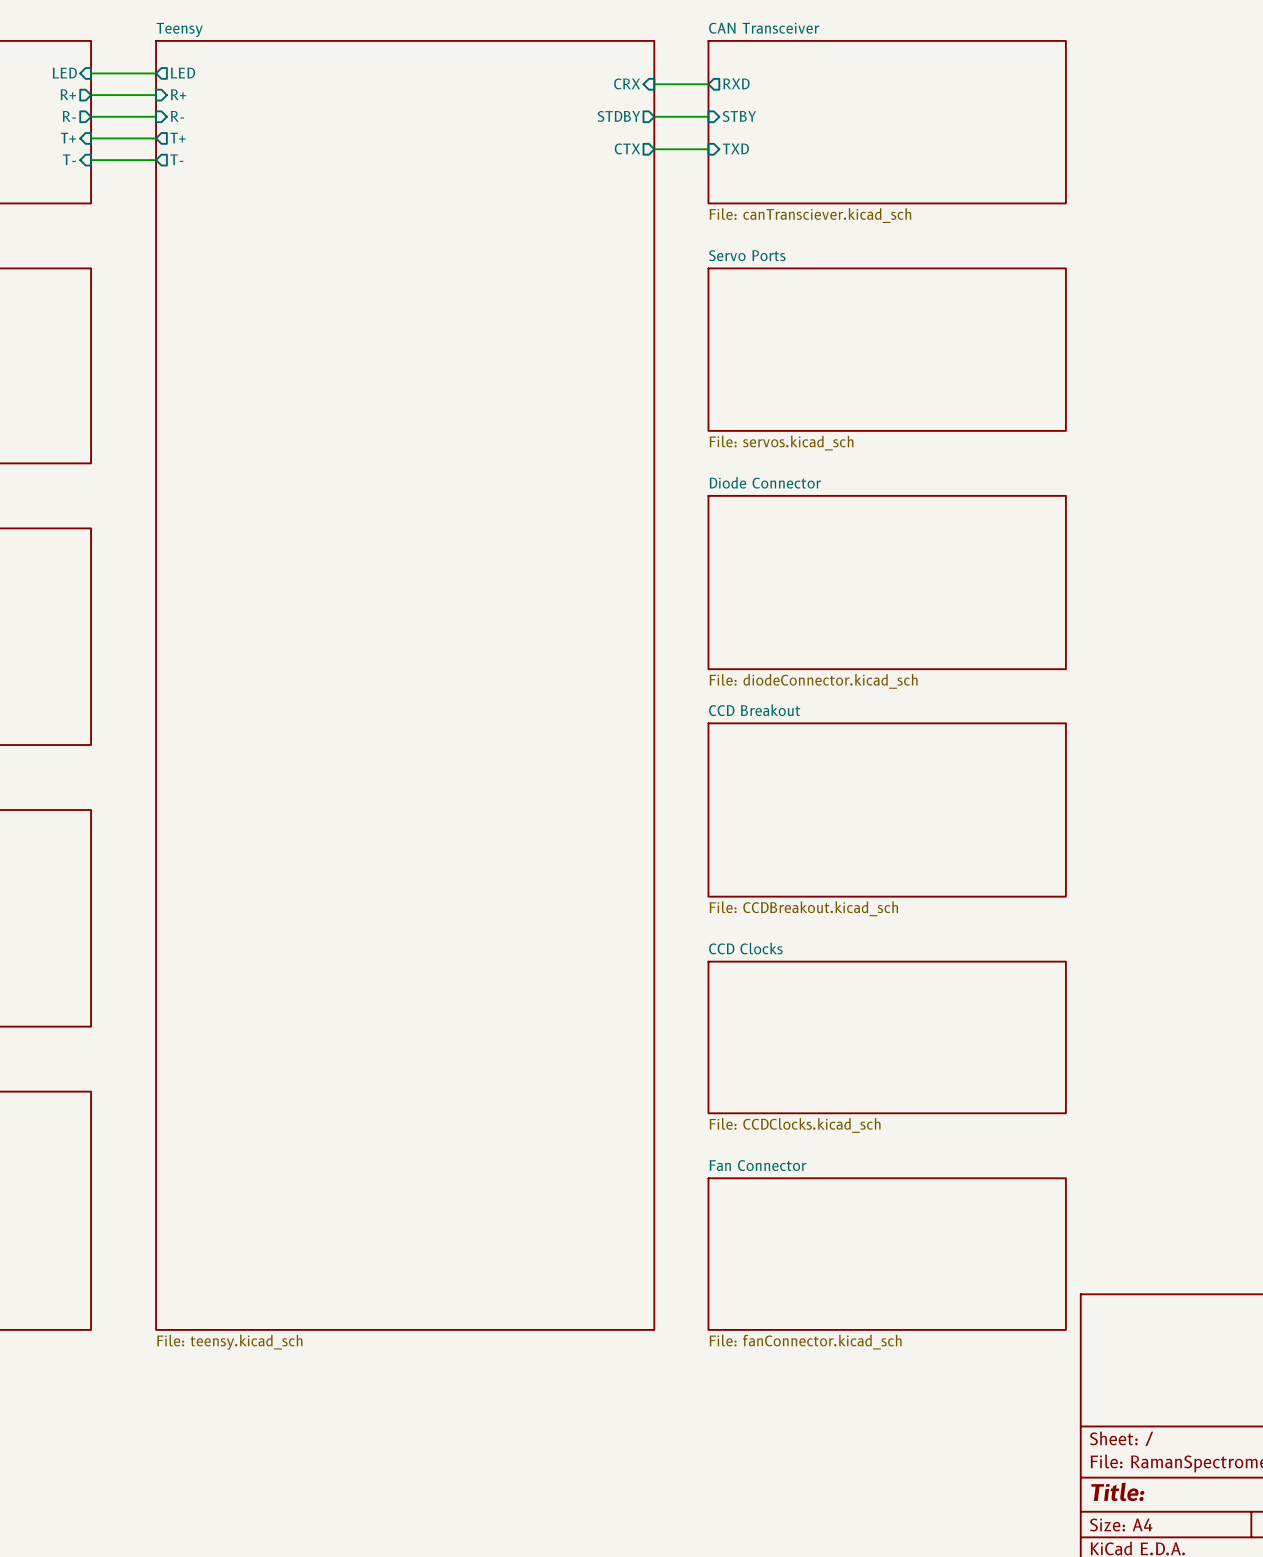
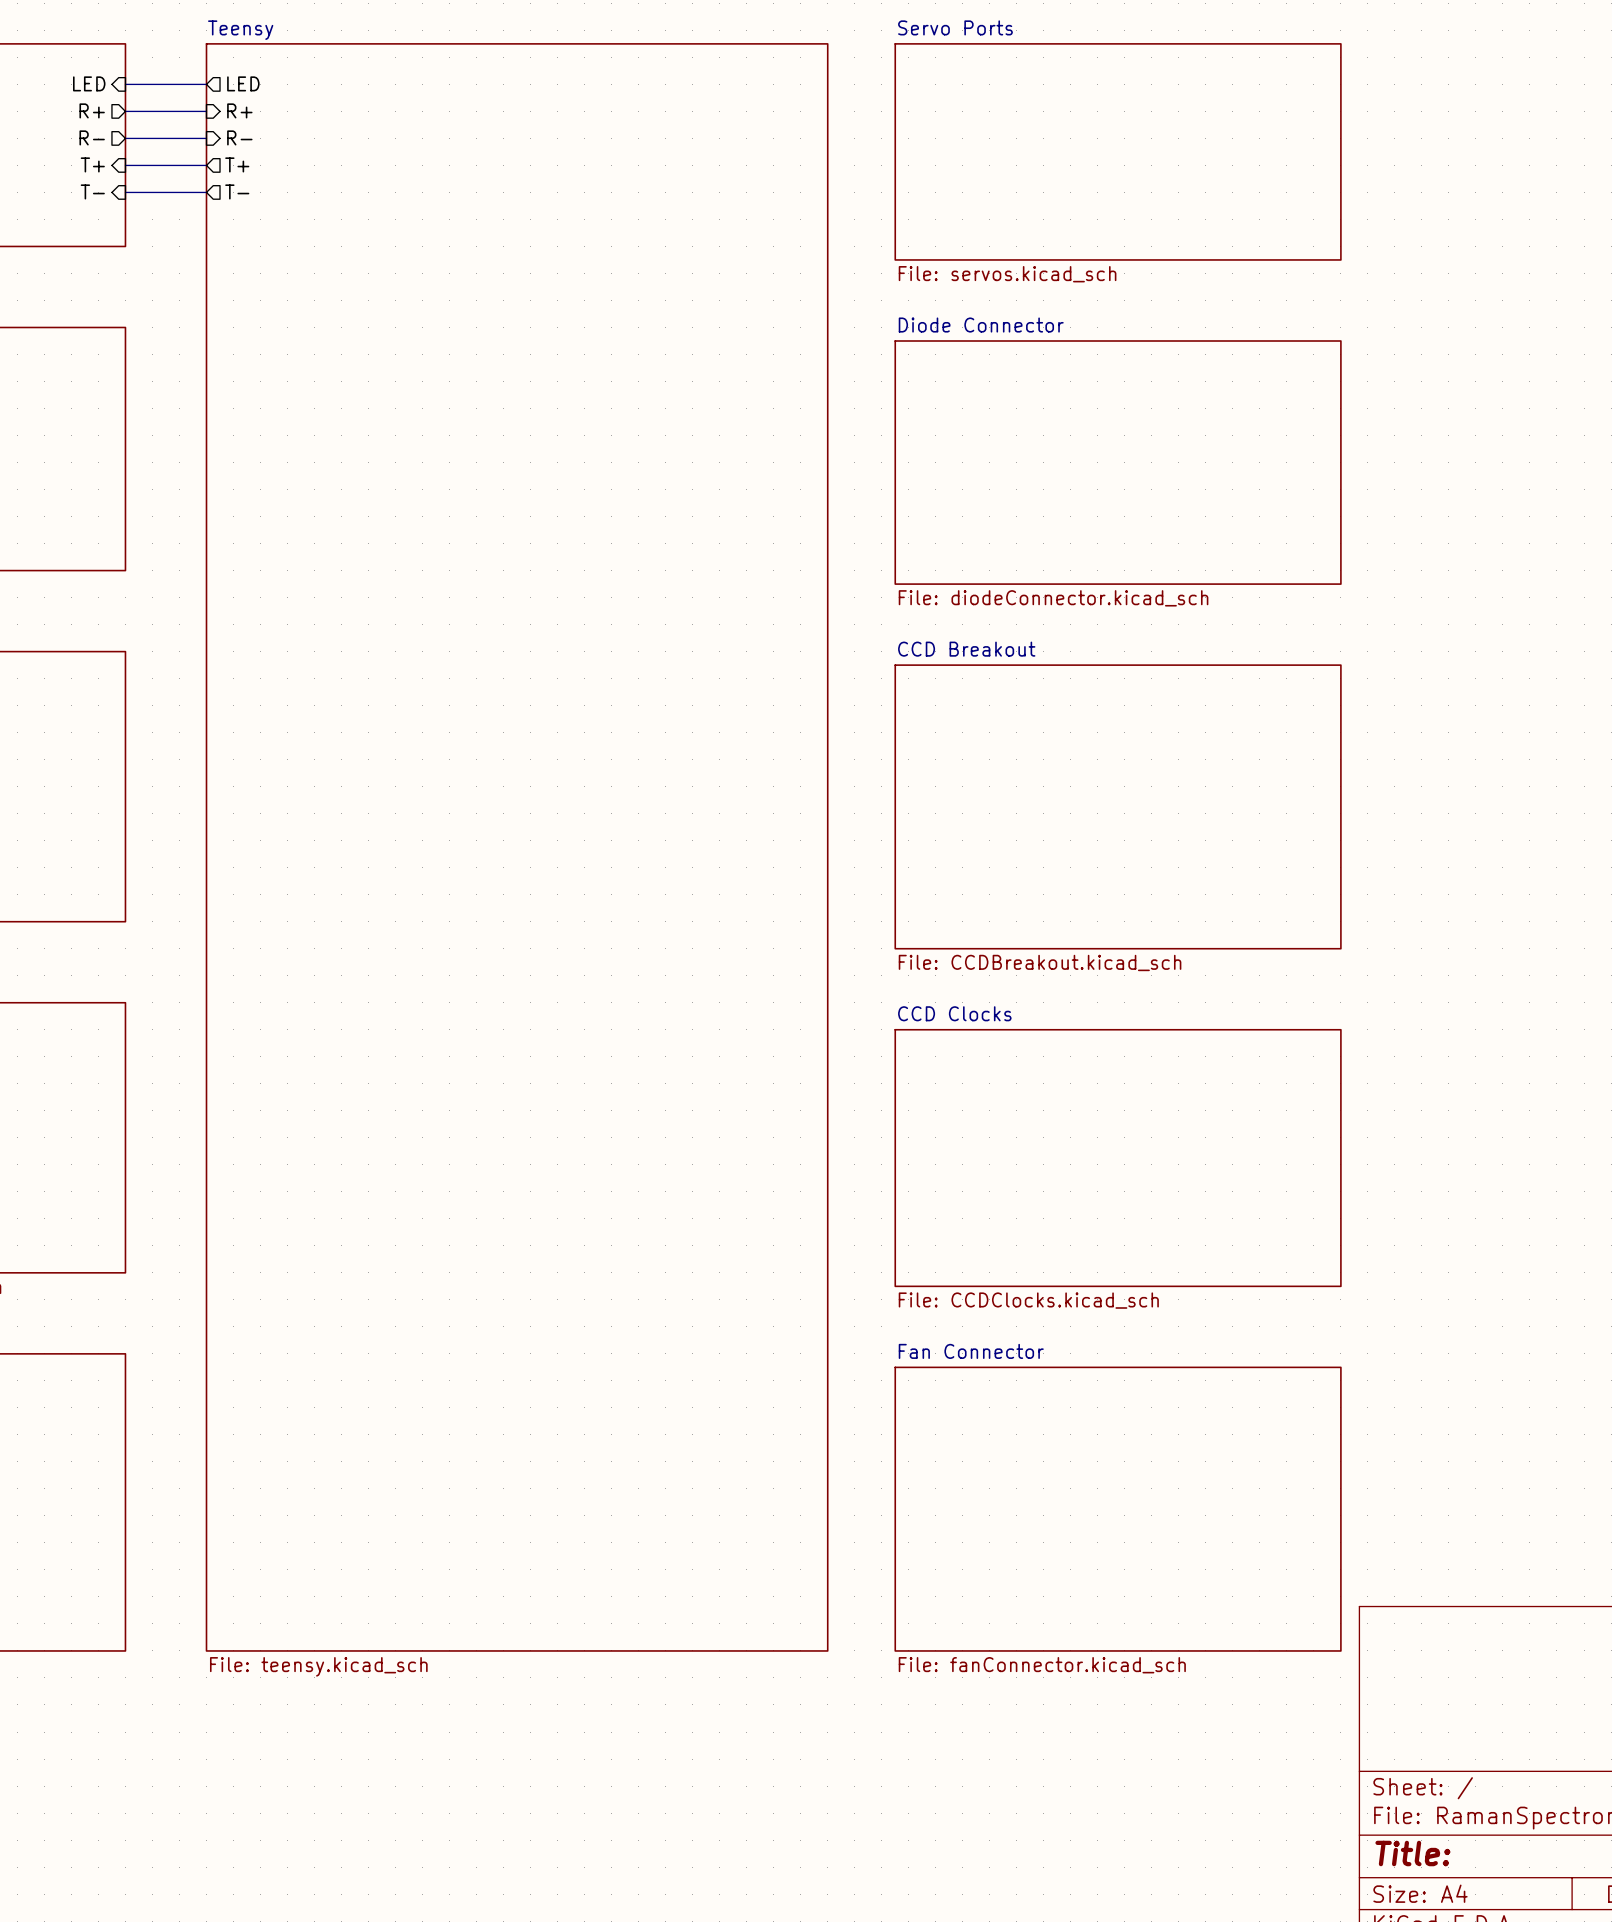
sheet pin: CRX (627, 83) -> none
sheet pin: RXD (736, 83) -> none
wire: (654, 84) (708, 84) -> none
sheet pin: STDBY (618, 116) -> none
wire: (654, 116) (708, 116) -> none
sheet pin: STBY (739, 116) -> none
sheet CAN Transceiver: File: canTransciever.kicad_sch (887, 122) -> none
sheet Servo Ports: none -> File: servos.kicad_sch (1118, 151)
sheet pin: CTX (627, 148) -> none
sheet pin: TXD (735, 148) -> none
wire: (654, 149) (708, 149) -> none
sheet Servo Ports: File: servos.kicad_sch (887, 349) -> none
sheet Diode Connector: none -> File: diodeConnector.kicad_sch (1118, 462)
sheet Diode Connector: File: diodeConnector.kicad_sch (887, 582) -> none
sheet CCD Breakout: none -> File: CCDBreakout.kicad_sch (1118, 806)
sheet CCD Breakout: File: CCDBreakout.kicad_sch (887, 810) -> none
sheet CCD Clocks: none -> File: CCDClocks.kicad_sch (1118, 1158)
sheet CCD Clocks: File: CCDClocks.kicad_sch (887, 1037) -> none
sheet Fan Connector: none -> File: fanConnector.kicad_sch (1118, 1509)
sheet Fan Connector: File: fanConnector.kicad_sch (887, 1254) -> none

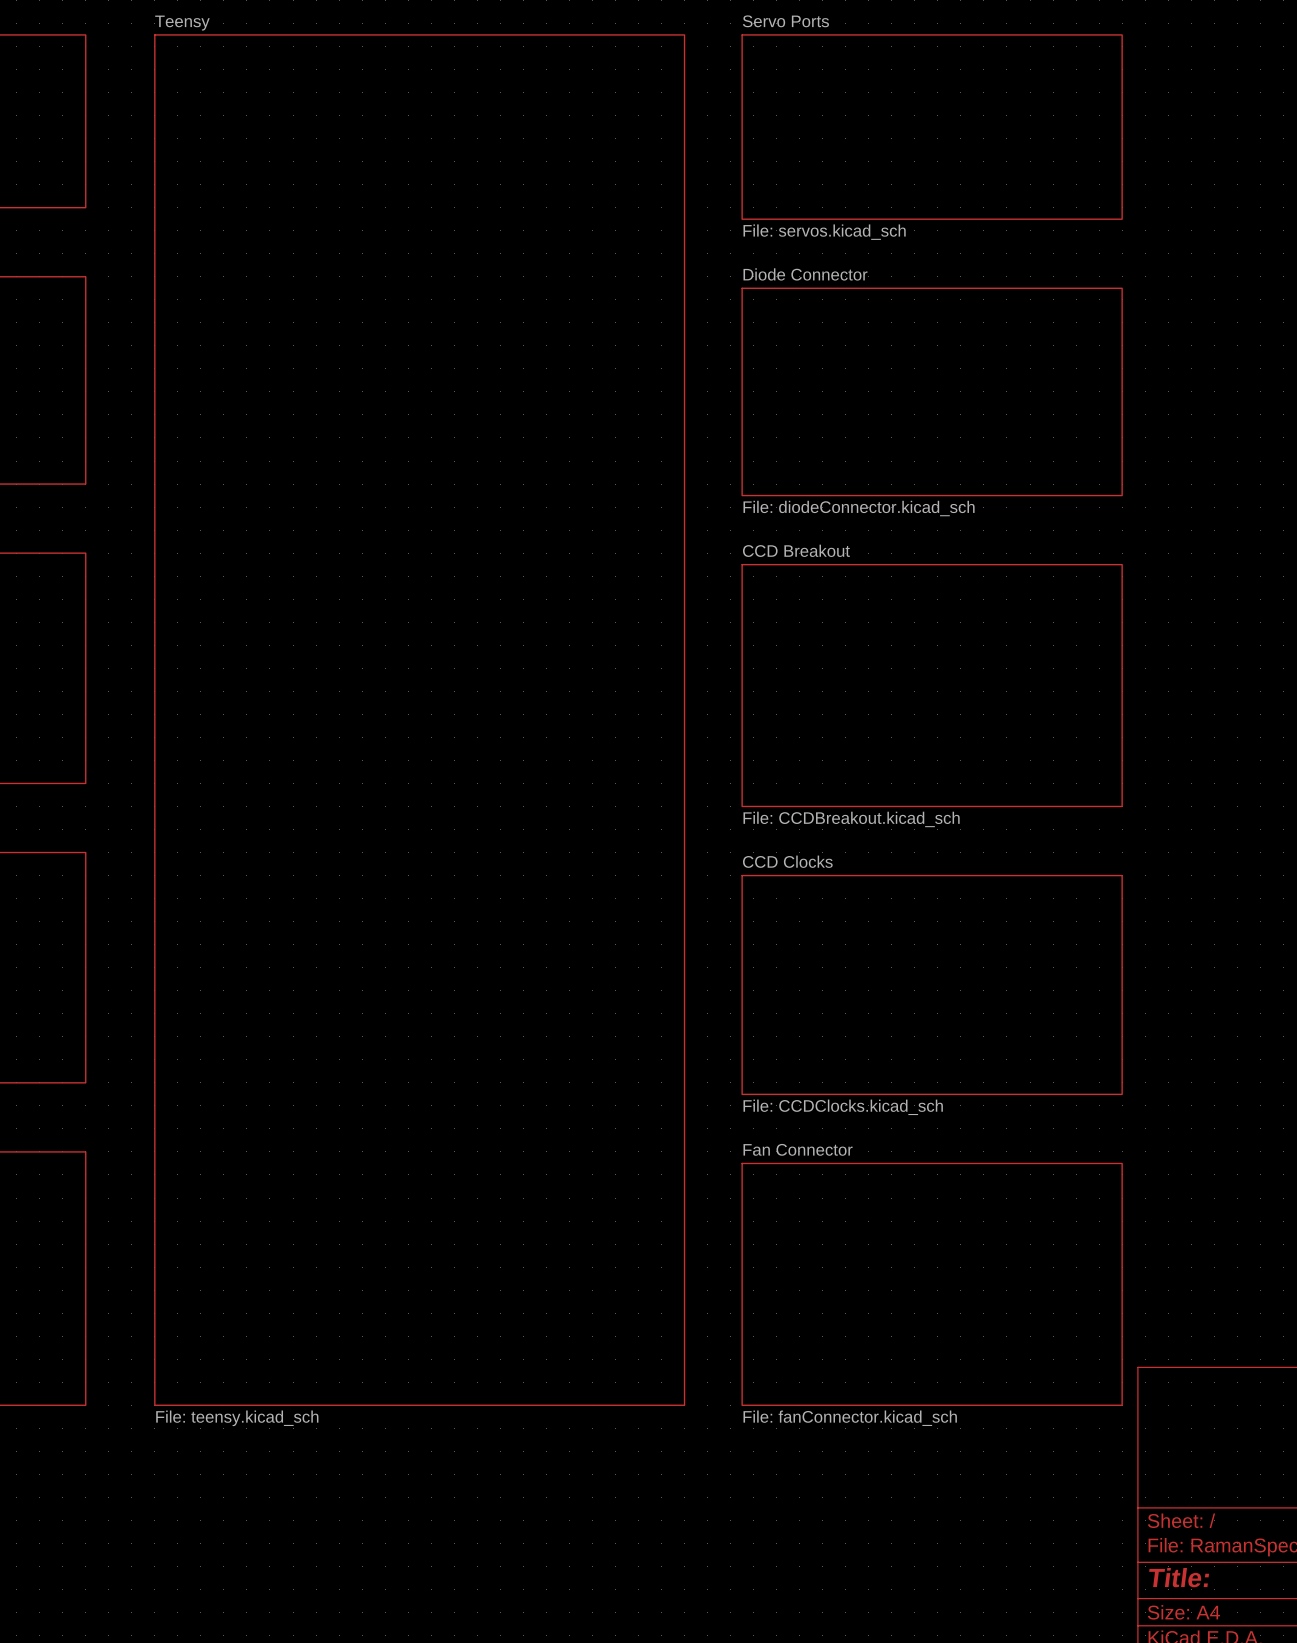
sheet pin: LED (89, 83) -> none
sheet pin: LED (243, 83) -> none
wire: (125, 84) (206, 84) -> none
sheet pin: R+ (92, 110) -> none
sheet pin: R+ (239, 110) -> none
wire: (125, 111) (206, 111) -> none
sheet pin: R- (92, 137) -> none
sheet pin: R- (239, 137) -> none
wire: (125, 138) (206, 138) -> none
sheet pin: T+ (92, 164) -> none
sheet pin: T+ (237, 164) -> none
wire: (125, 165) (206, 165) -> none
sheet pin: T- (92, 191) -> none
sheet pin: T- (237, 191) -> none
wire: (125, 192) (206, 192) -> none

